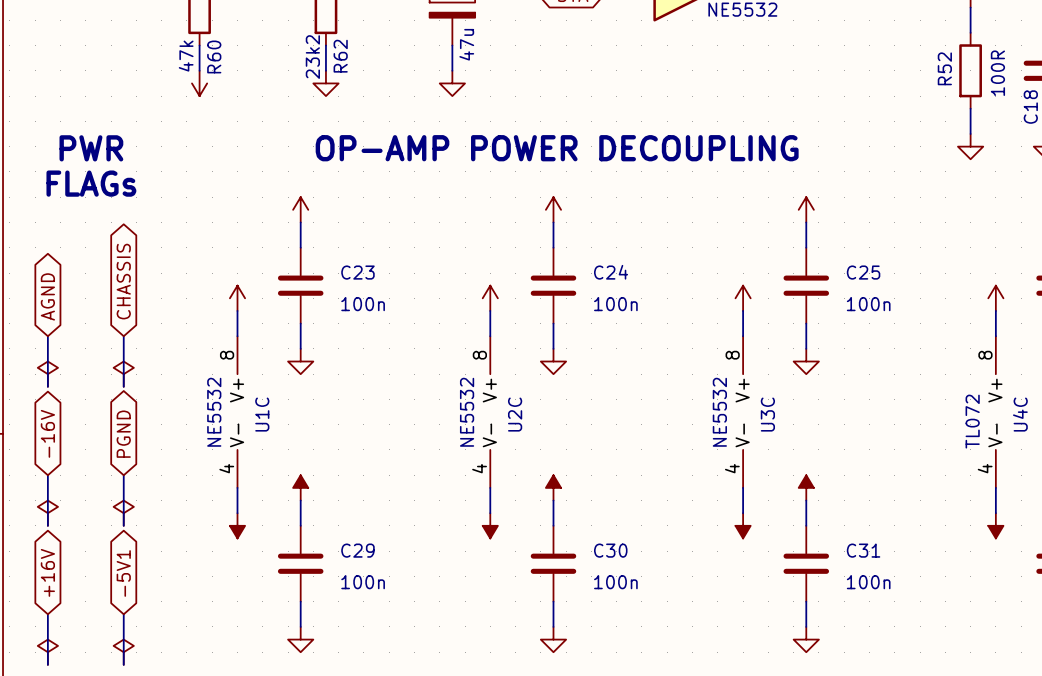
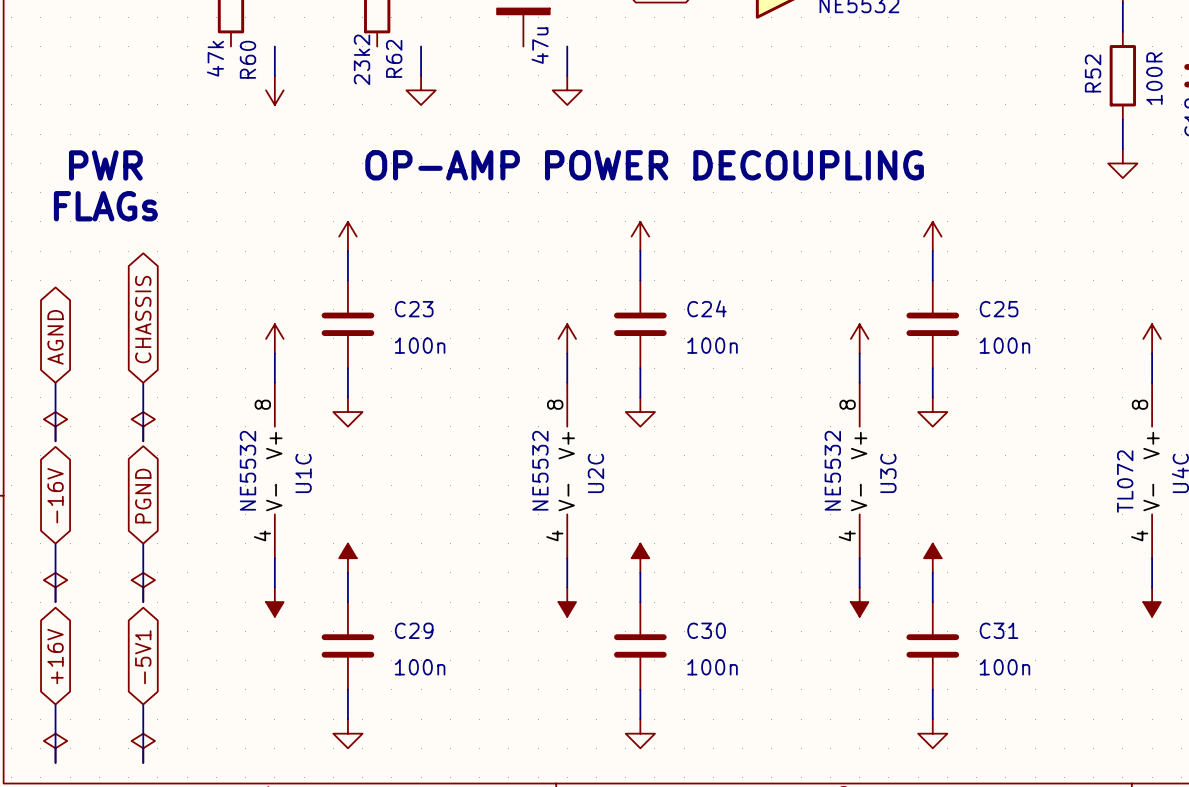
wire: (199, 45) (199, 70) -> (274, 46) (274, 75)
wire: (325, 45) (325, 70) -> (421, 46) (421, 75)
wire: (452, 45) (452, 70) -> (567, 46) (567, 75)
power symbol position: (199, 83) -> (274, 90)
power symbol position: (325, 83) -> (421, 90)
power symbol position: (452, 83) -> (567, 90)

